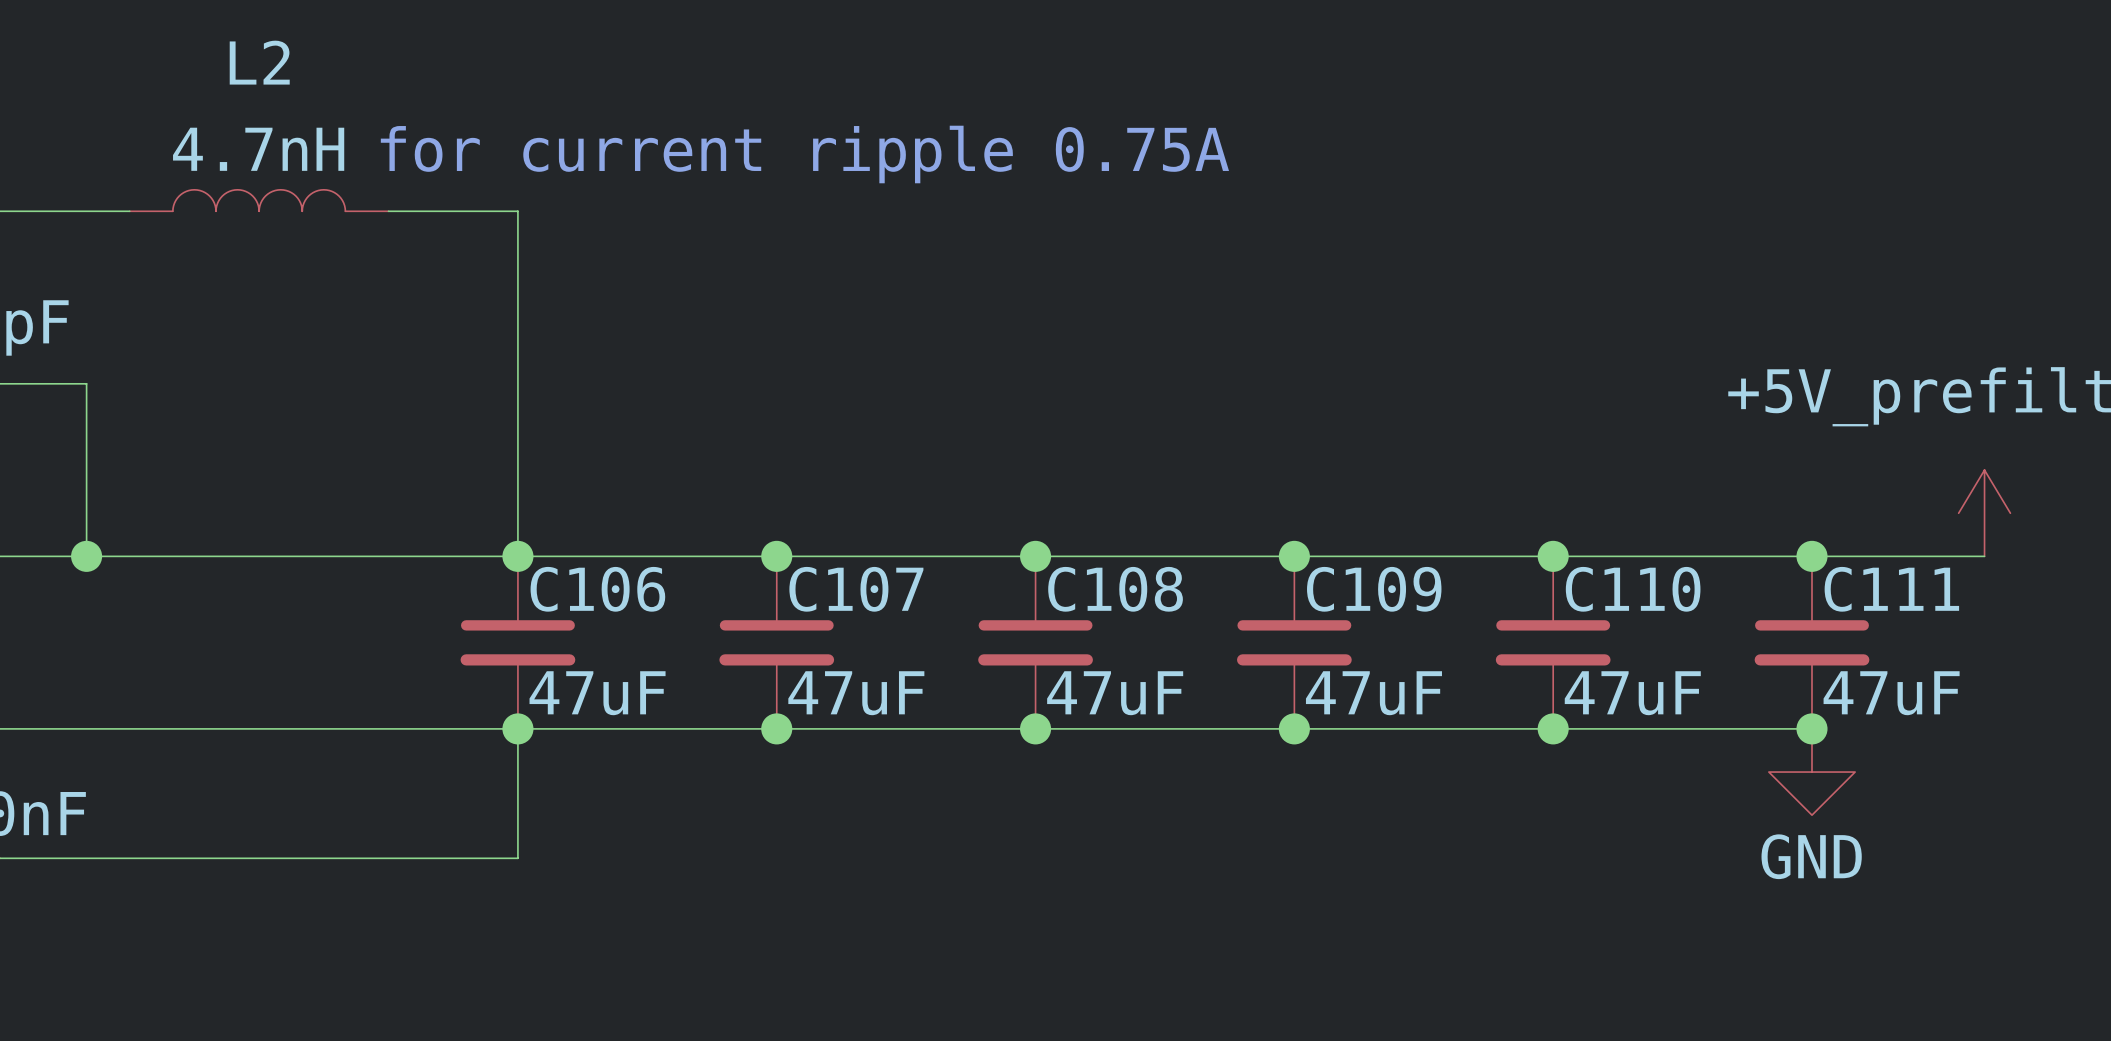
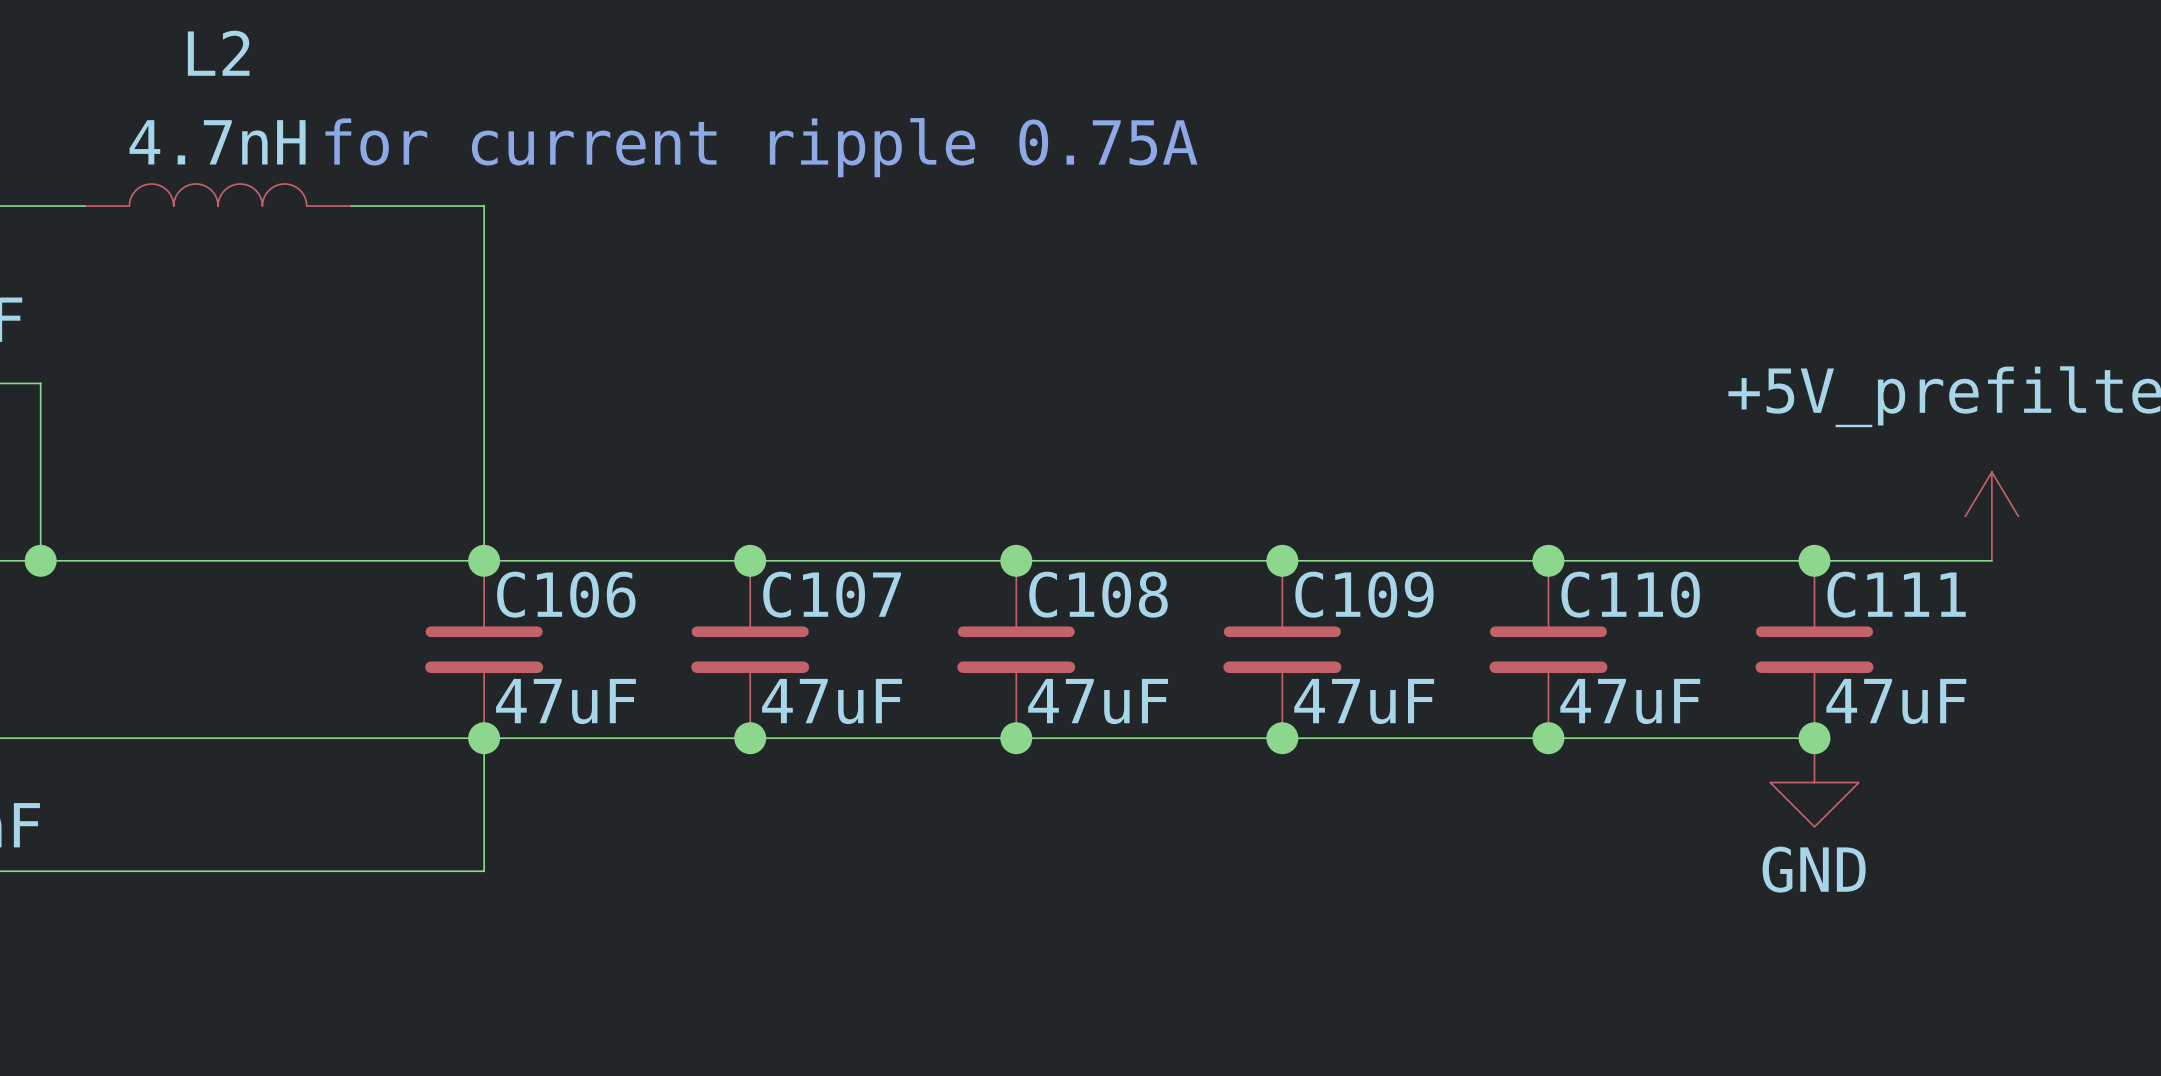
text position: for current ripple 0.75A (804, 154) -> for current ripple 0.75A (761, 147)

